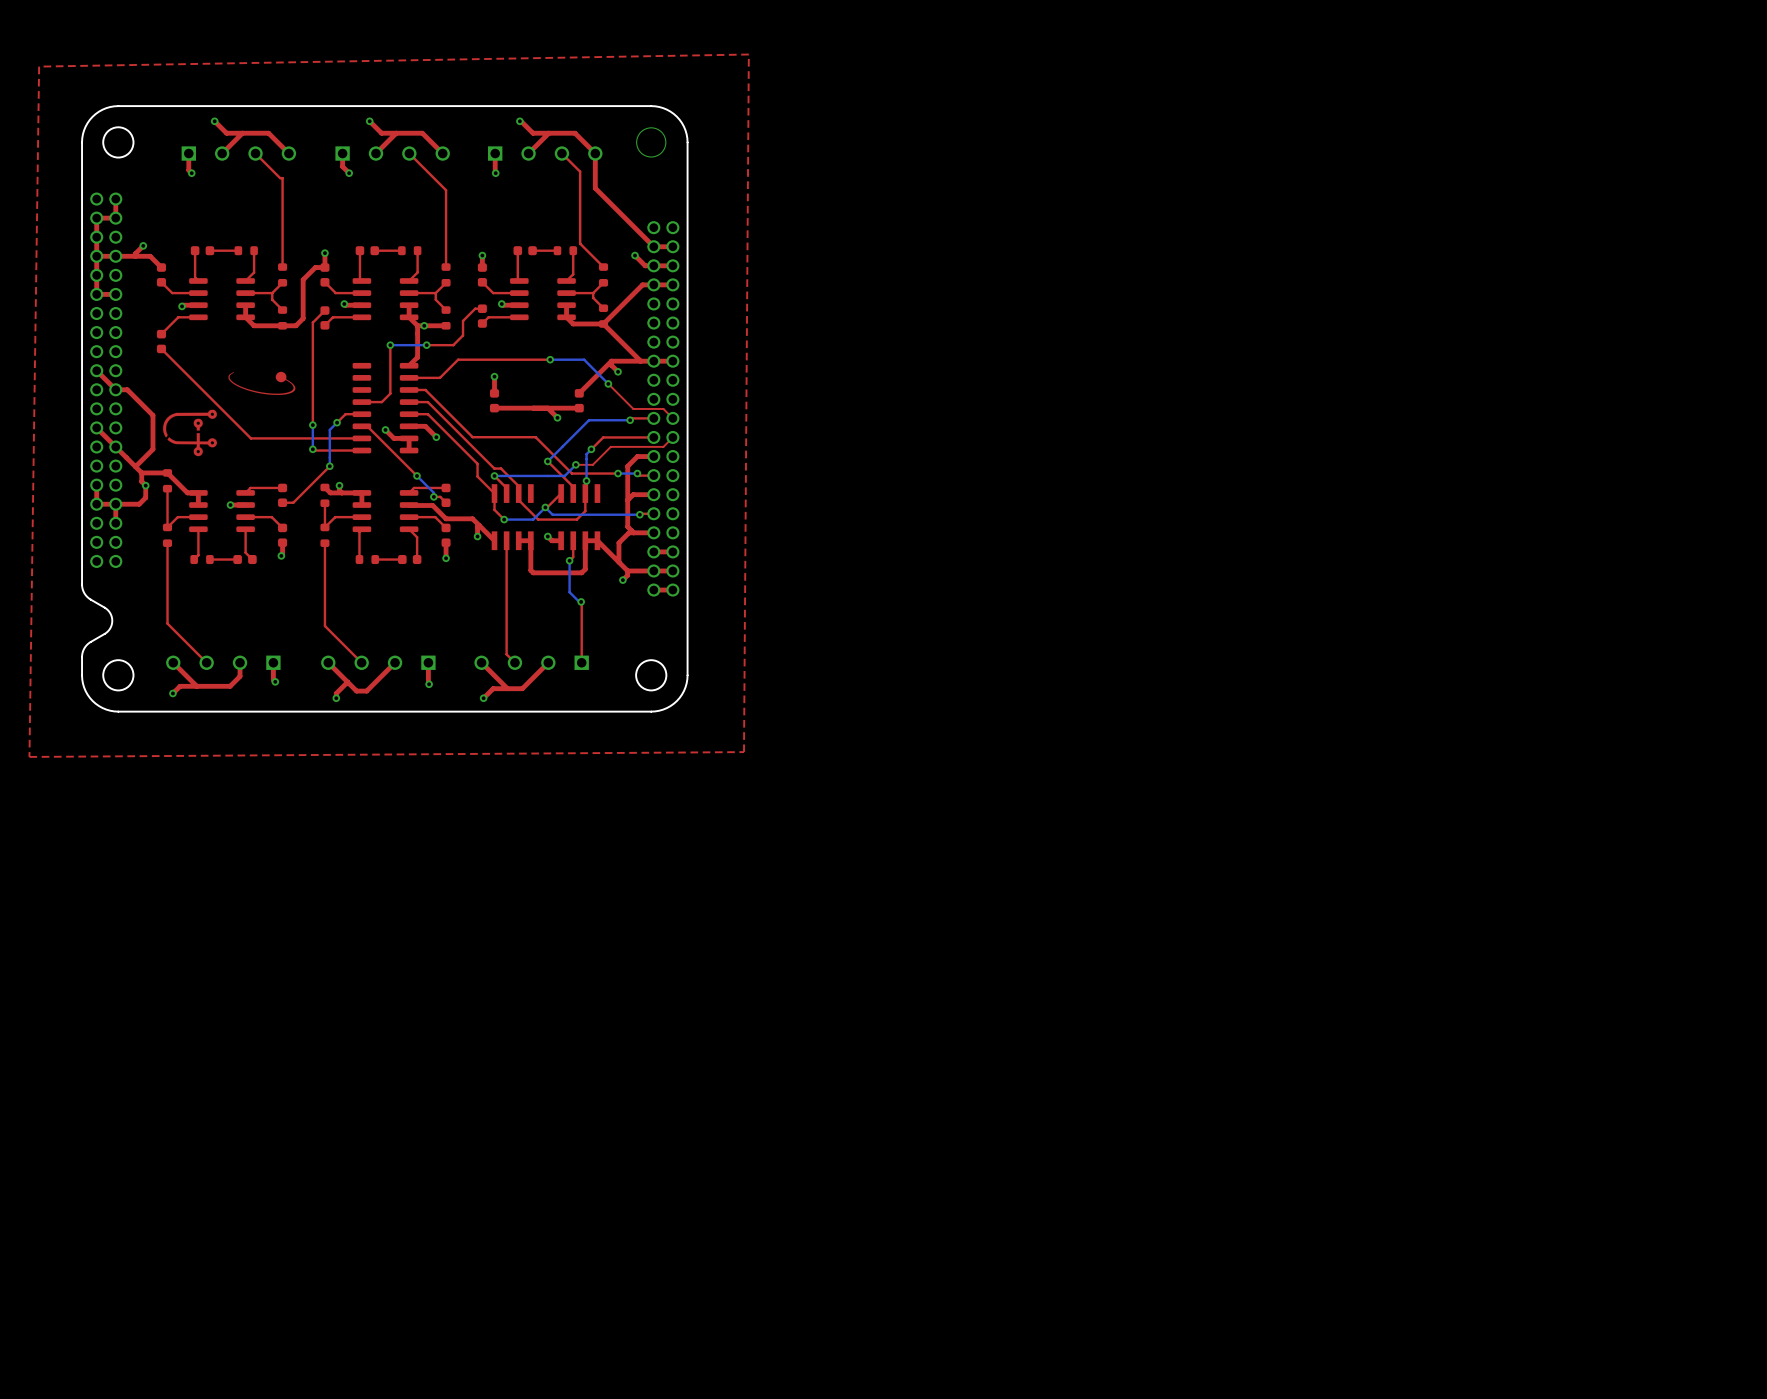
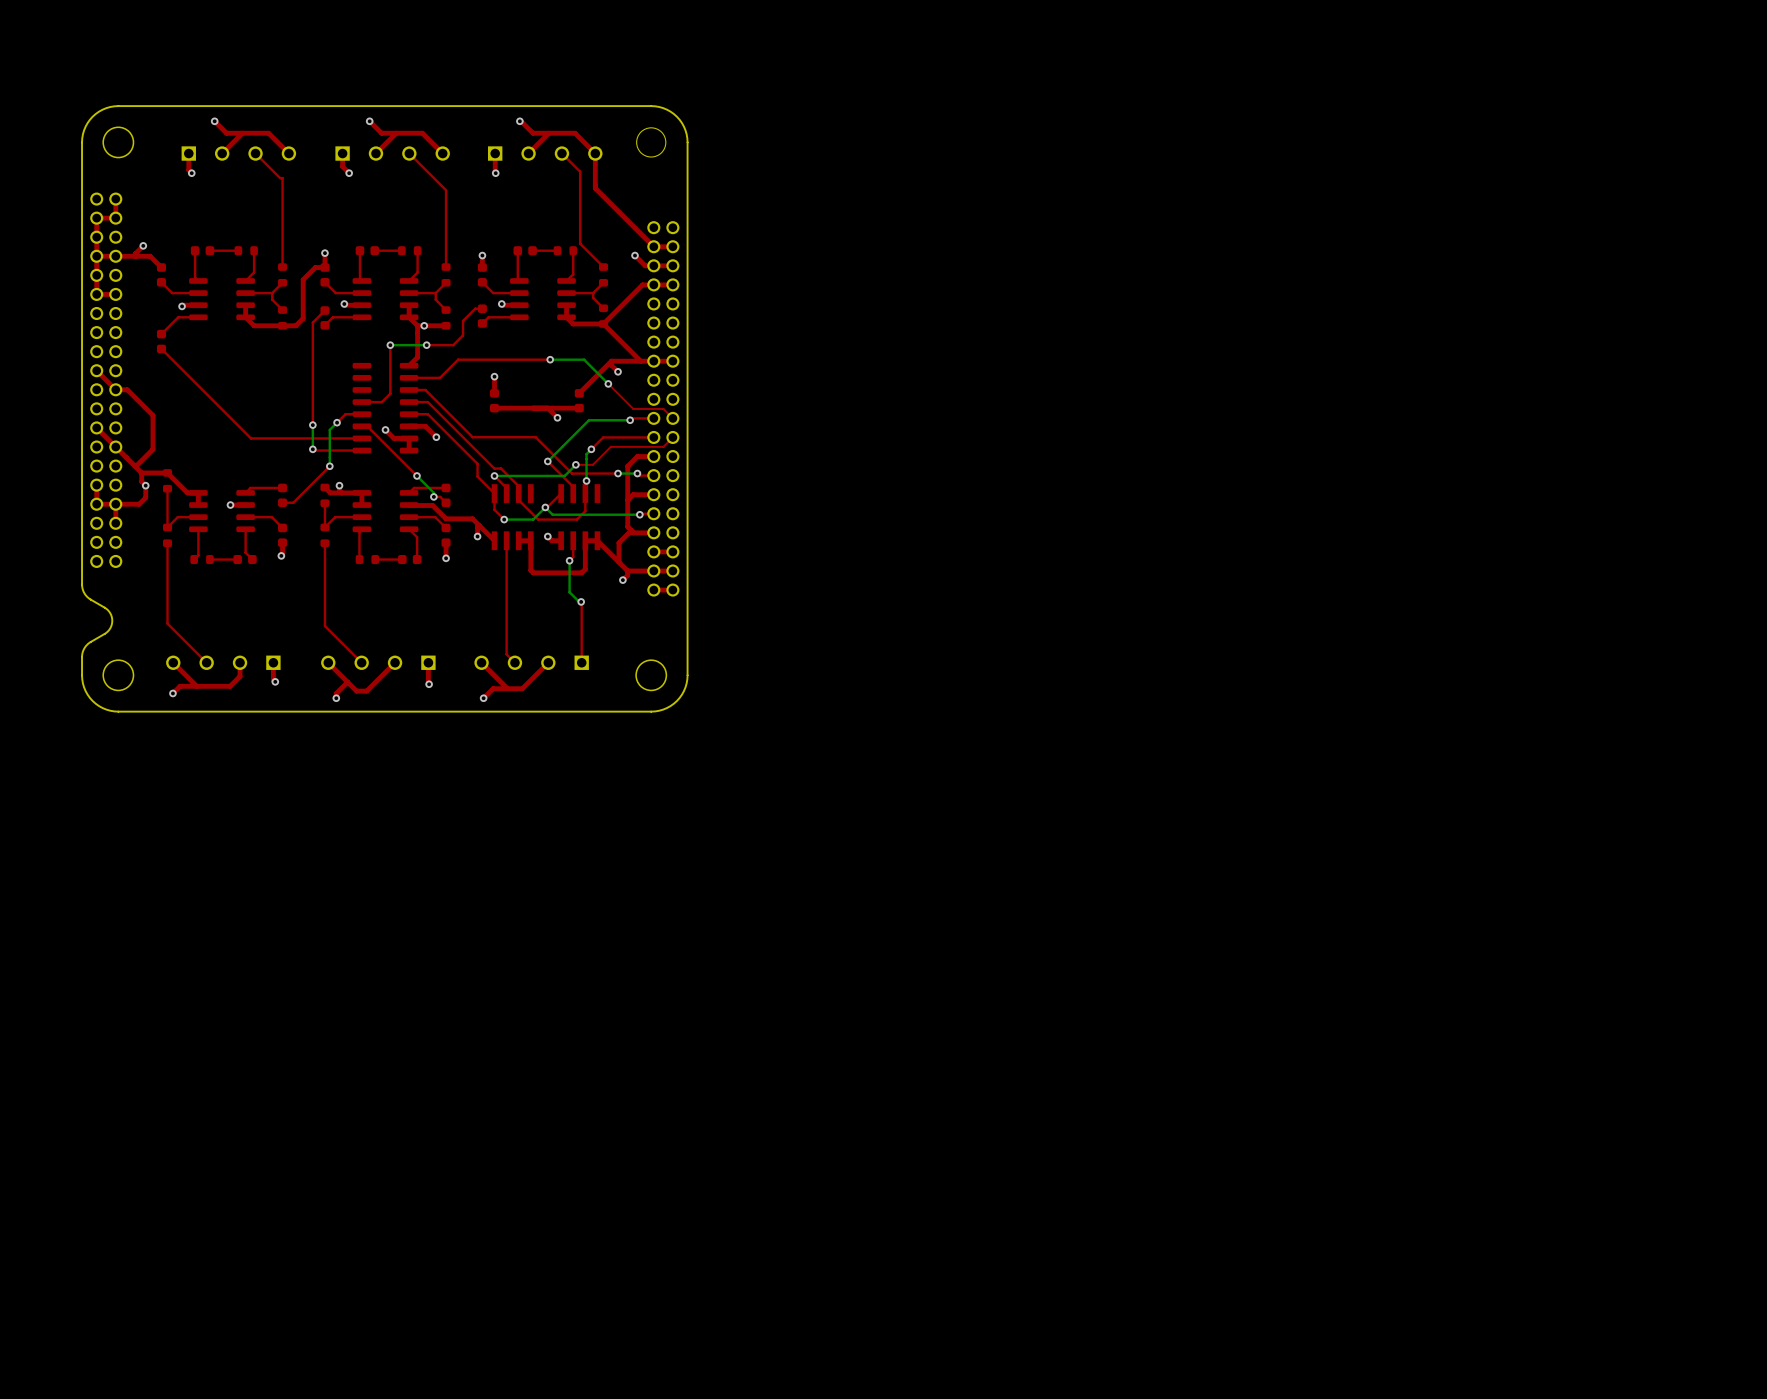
top zone outline: (748, 54) (743, 752) (29, 756) (39, 66) (748, 54) -> none
drawing: [228, 371, 296, 395] -> none
drawing: [163, 409, 218, 457] -> none

